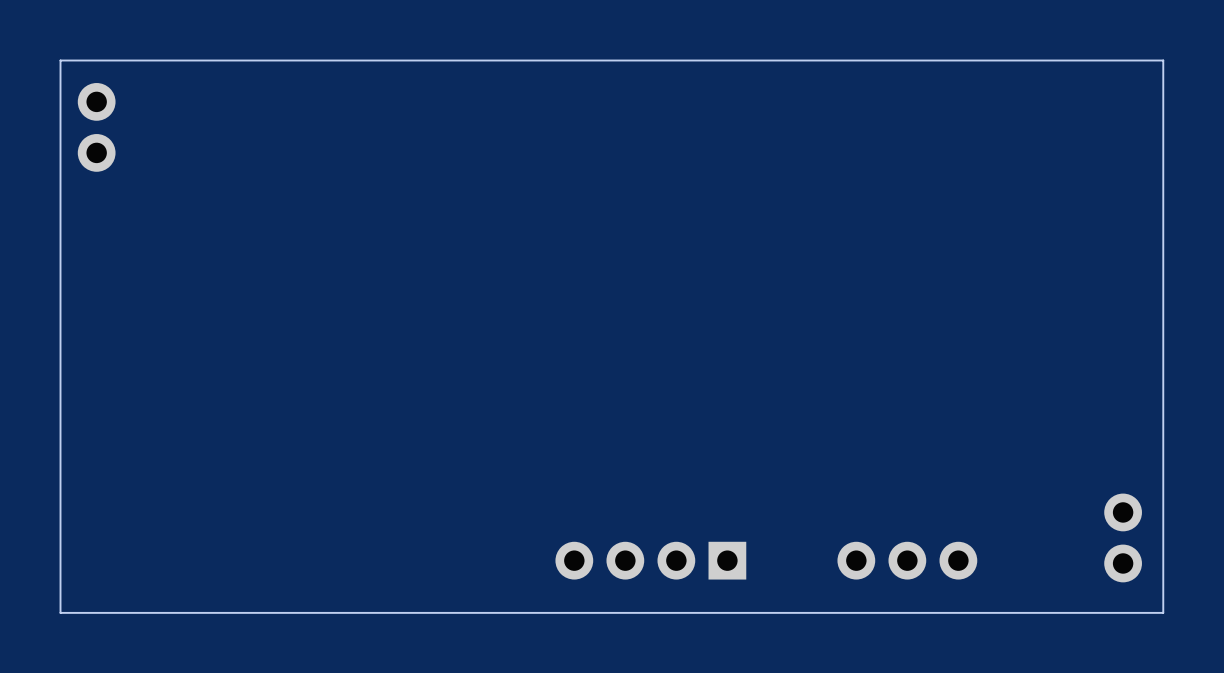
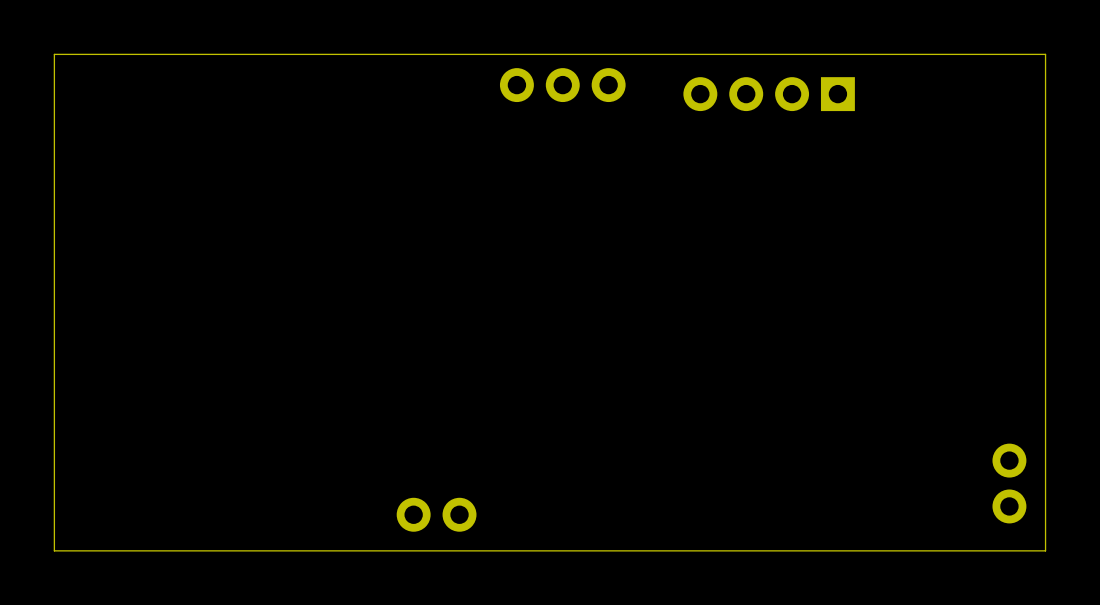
part: none -> (562, 85)
part: (96, 127) -> none
part position: (650, 560) -> (769, 94)
part: (907, 560) -> none
part: none -> (436, 514)

